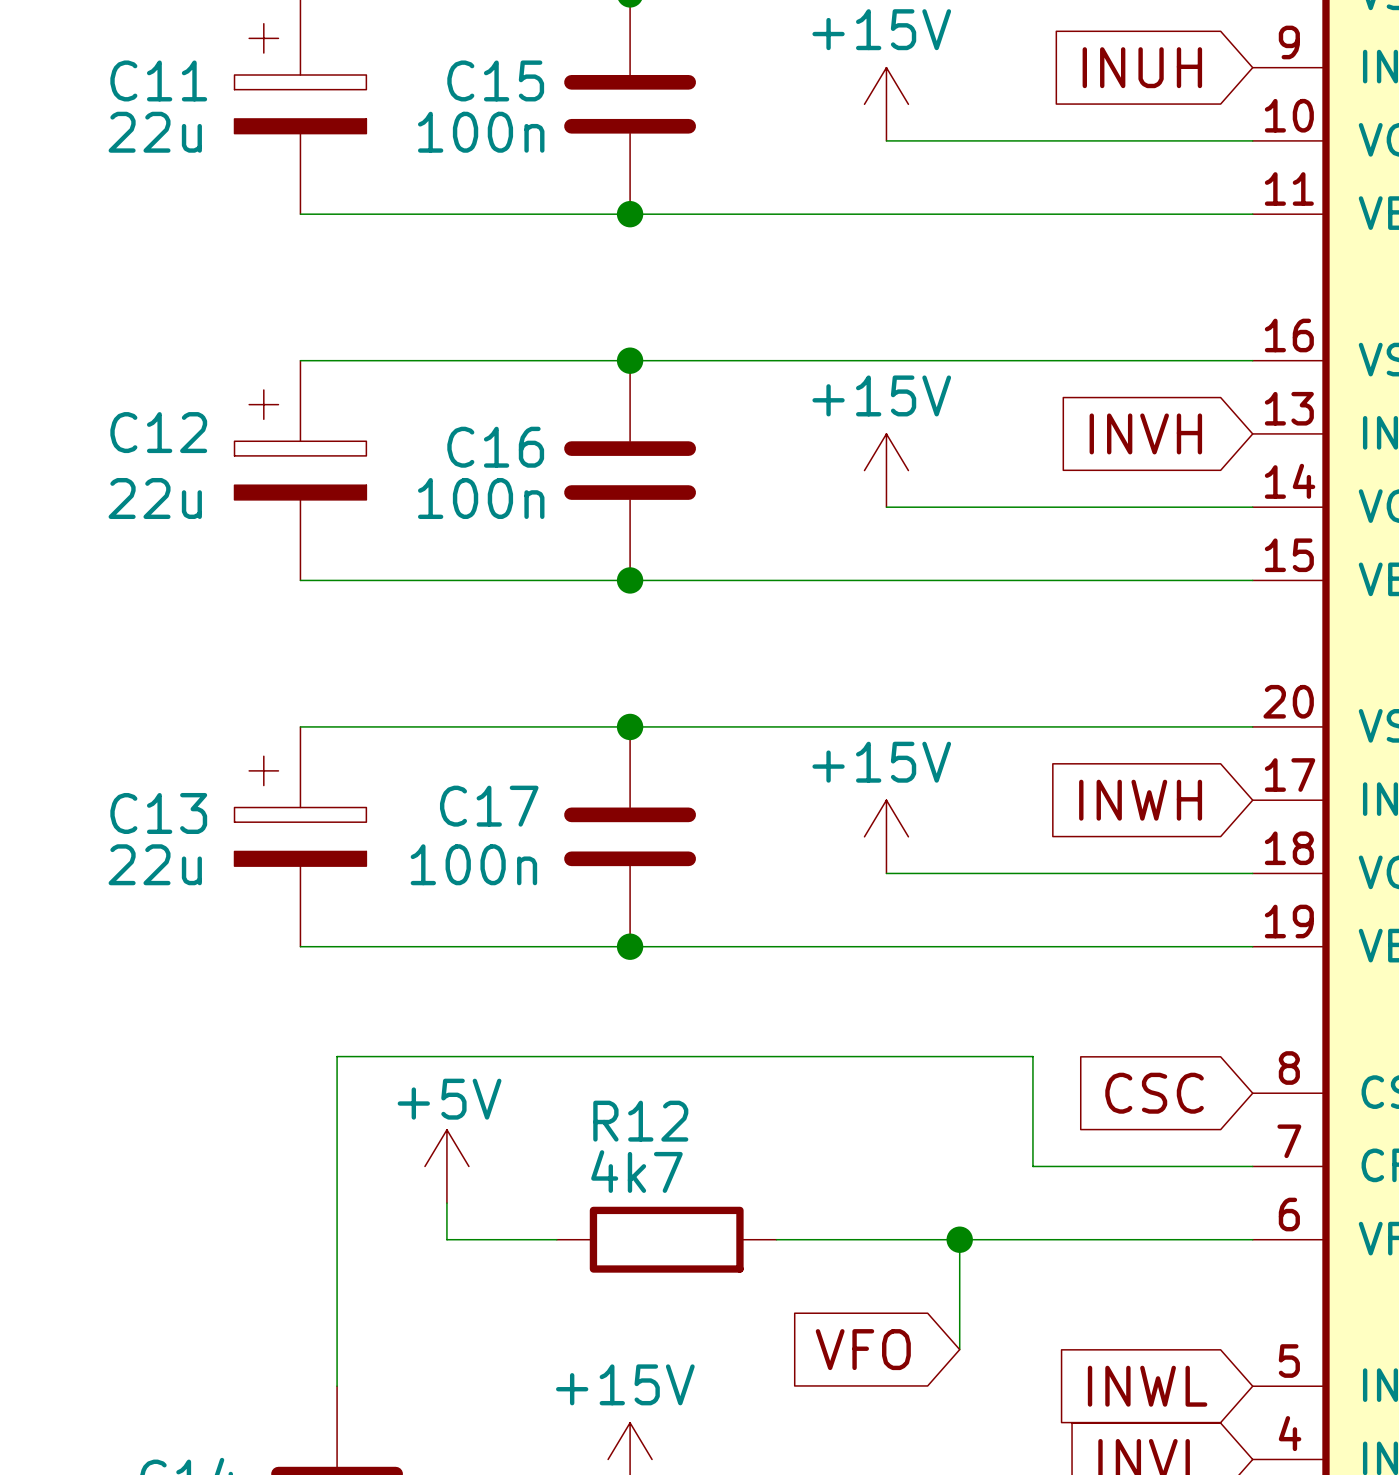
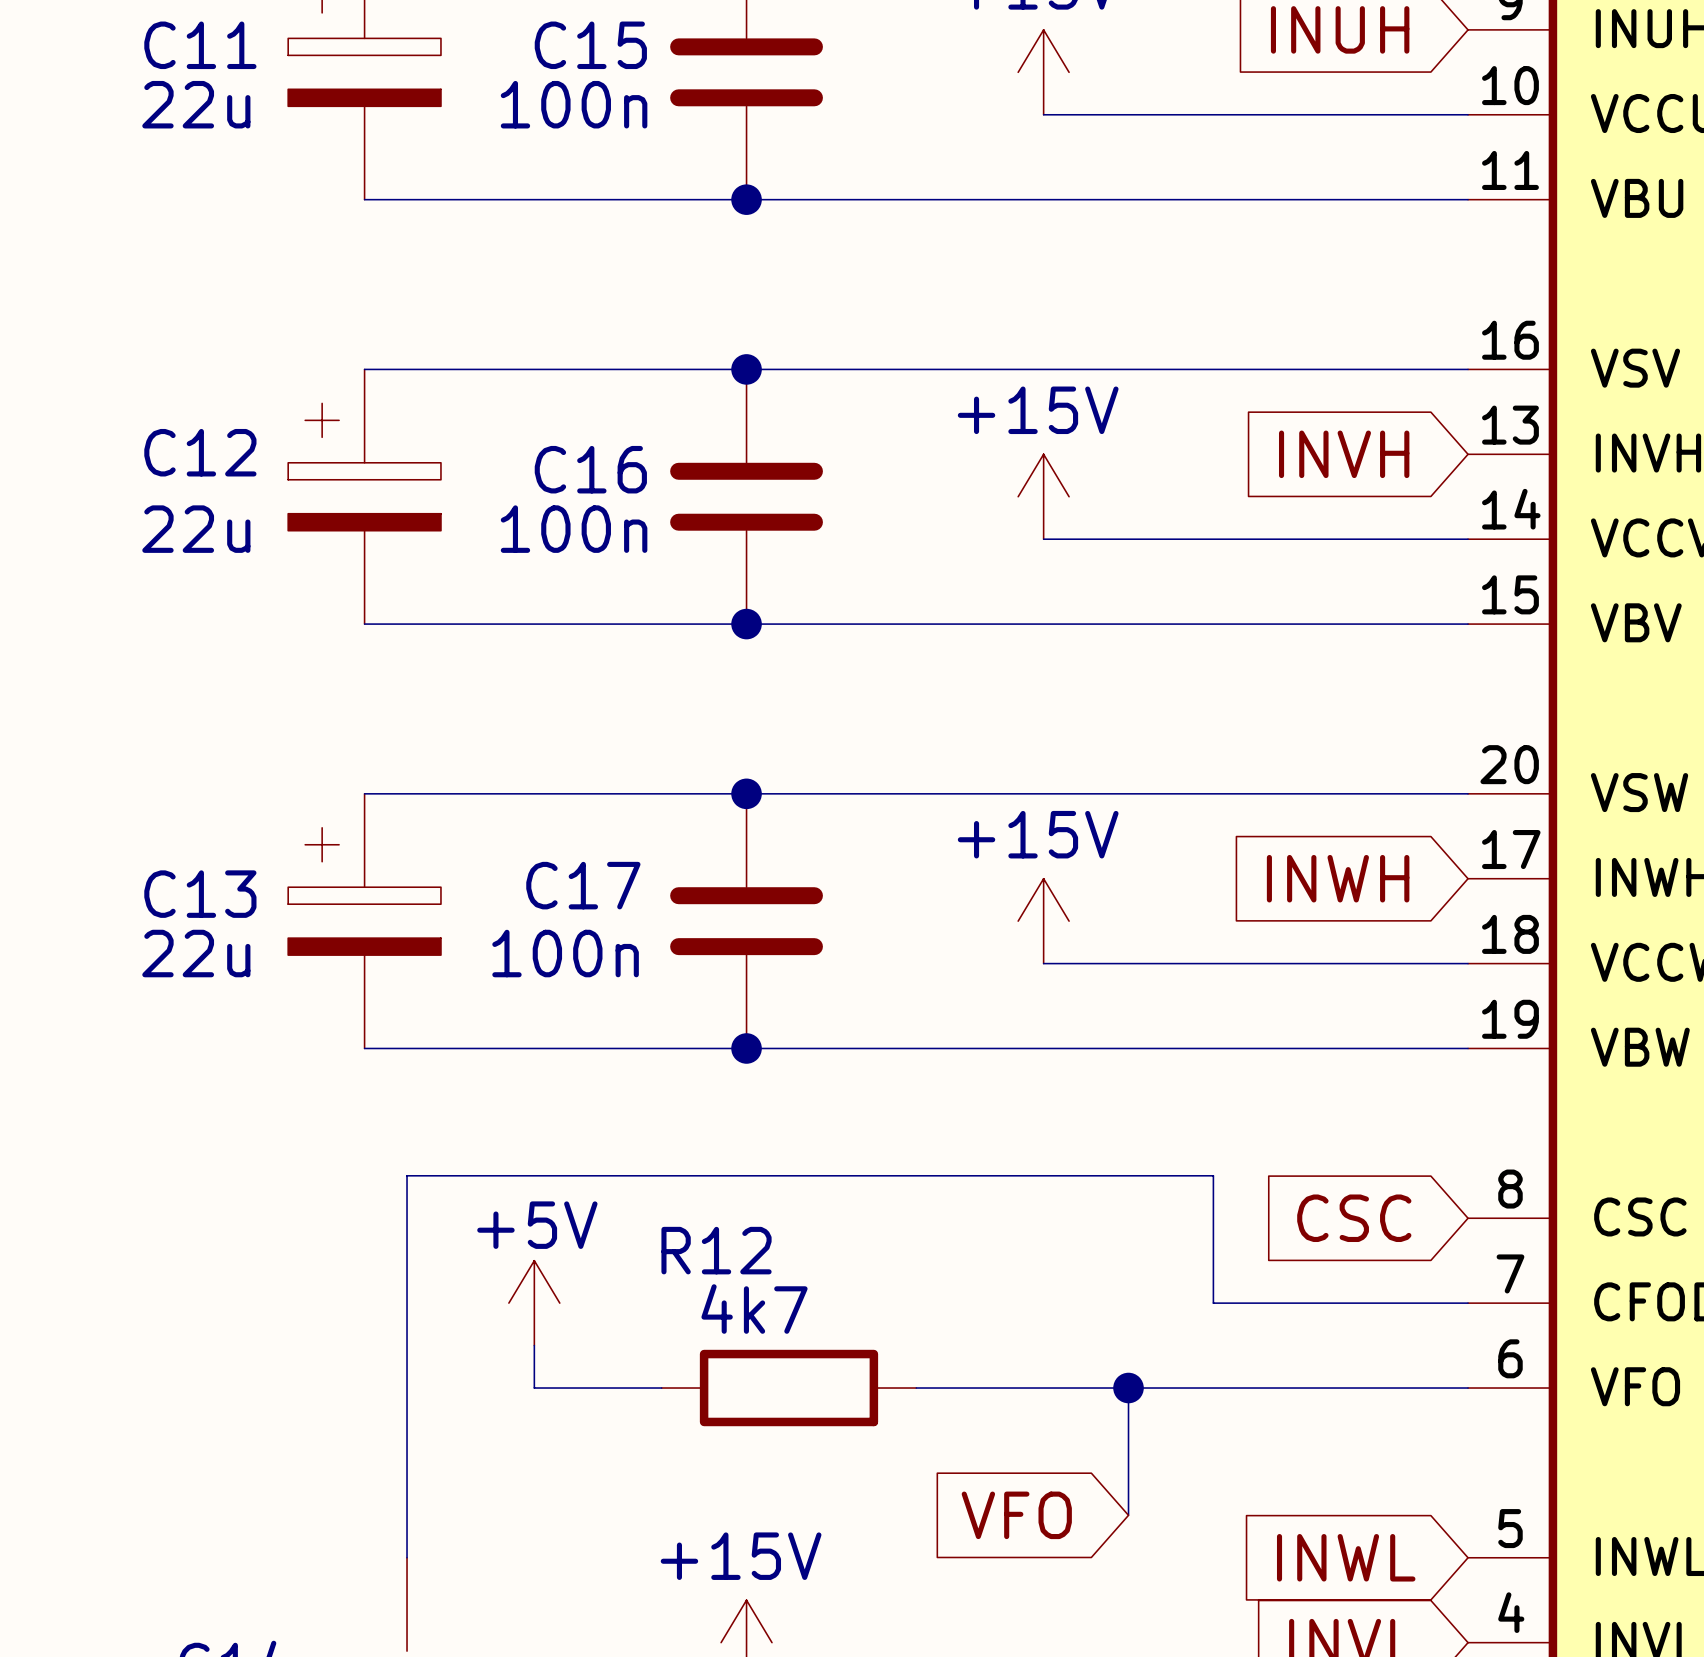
R12 name position: R12 (640, 1121) -> R12 (716, 1250)

